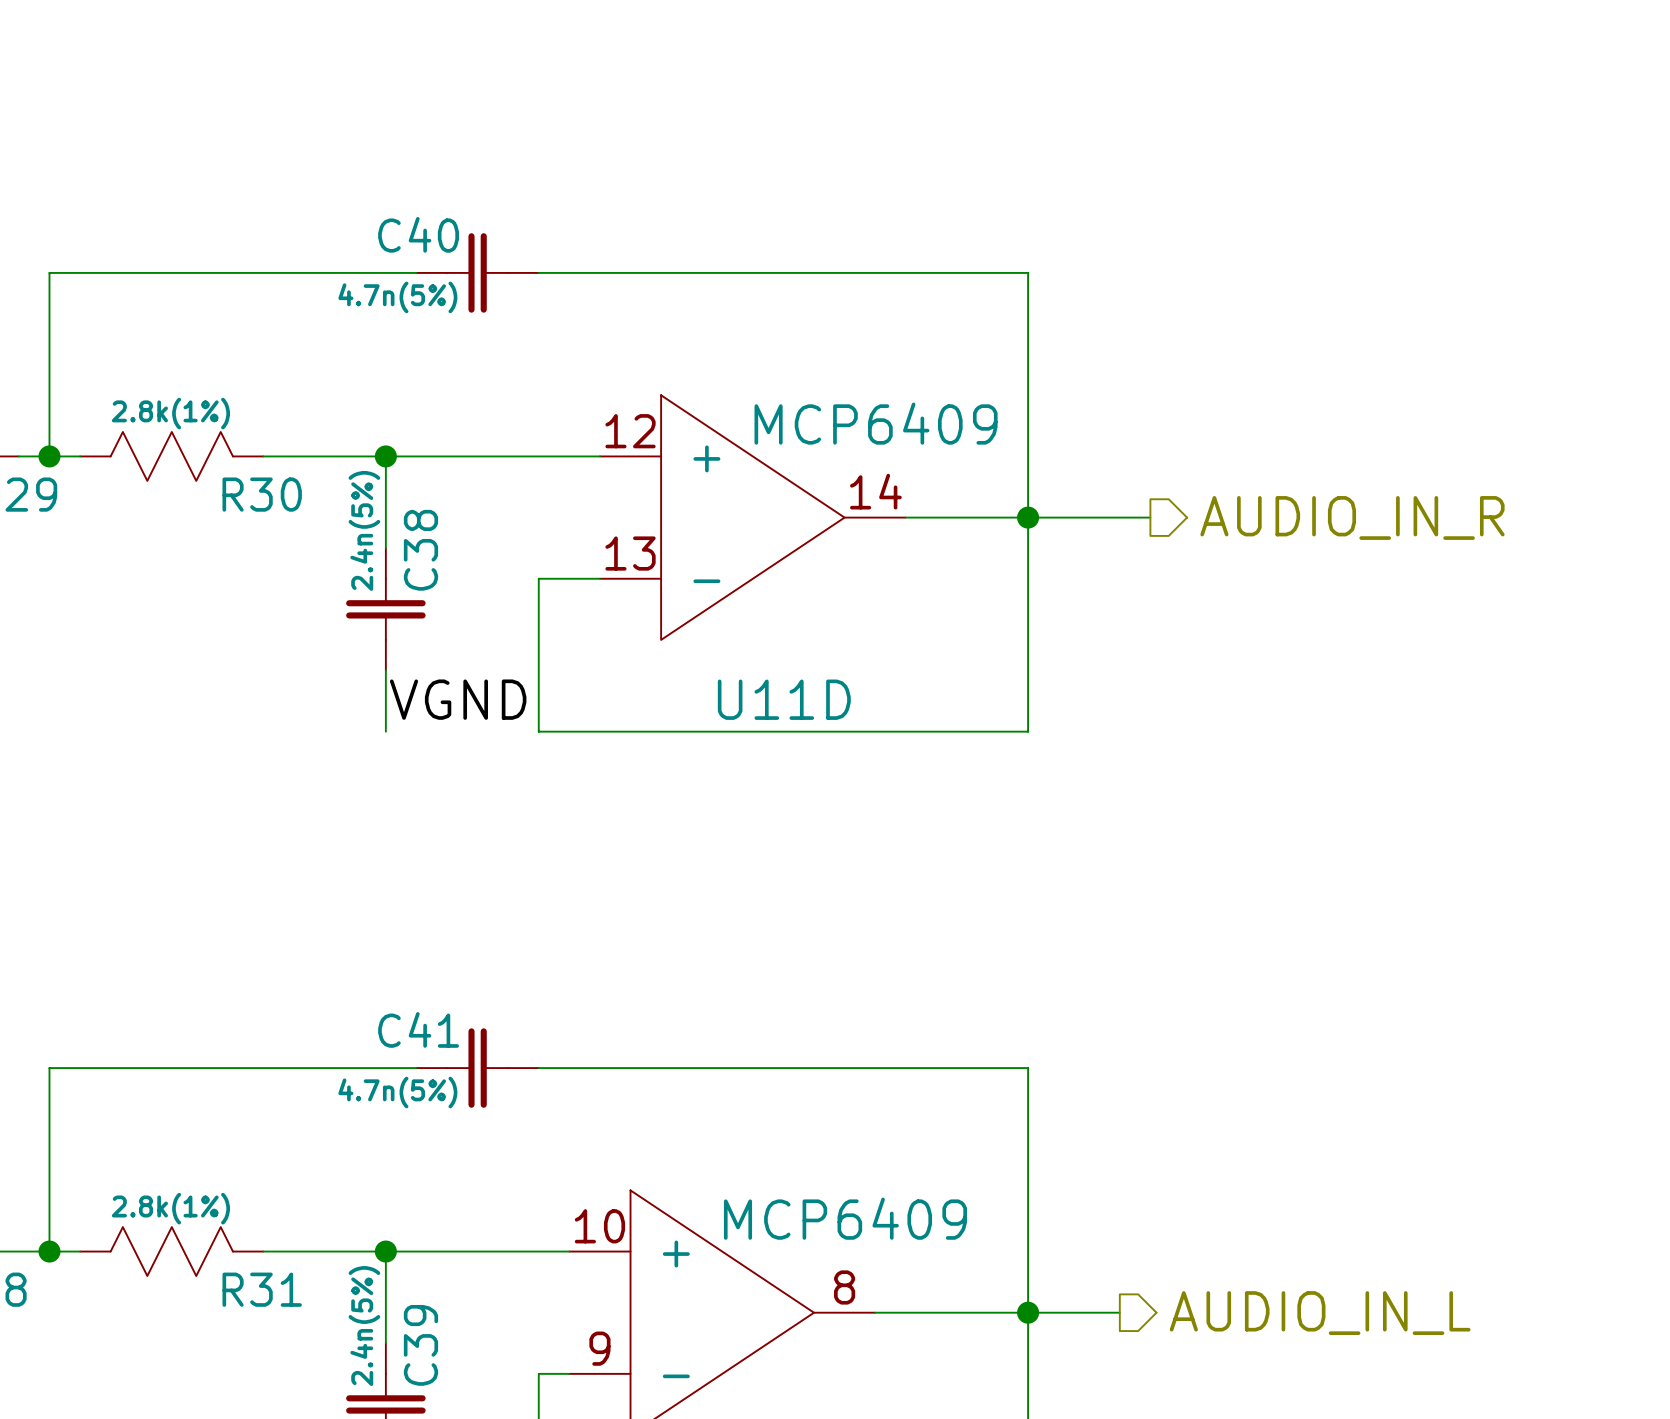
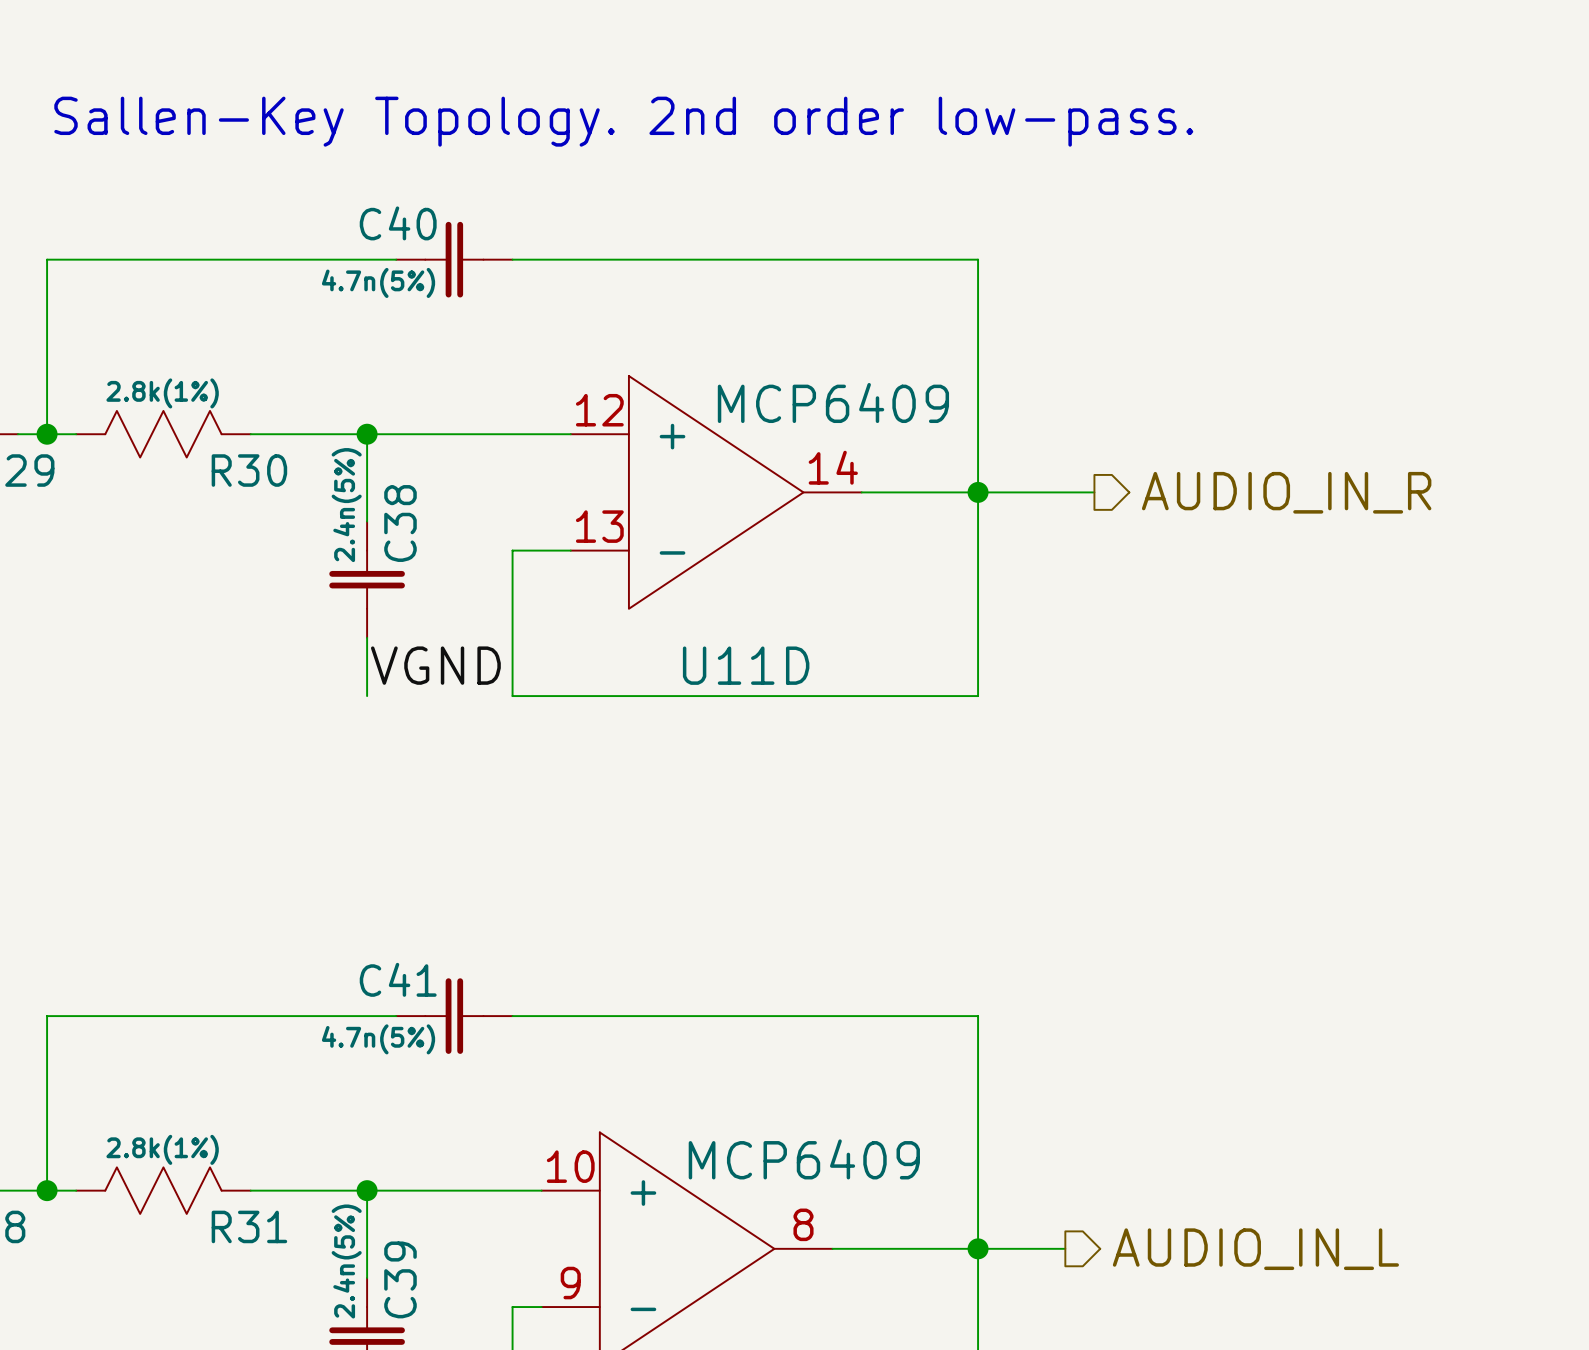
text: none -> Sallen-Key Topology. 2nd order low-pass. (623, 121)

